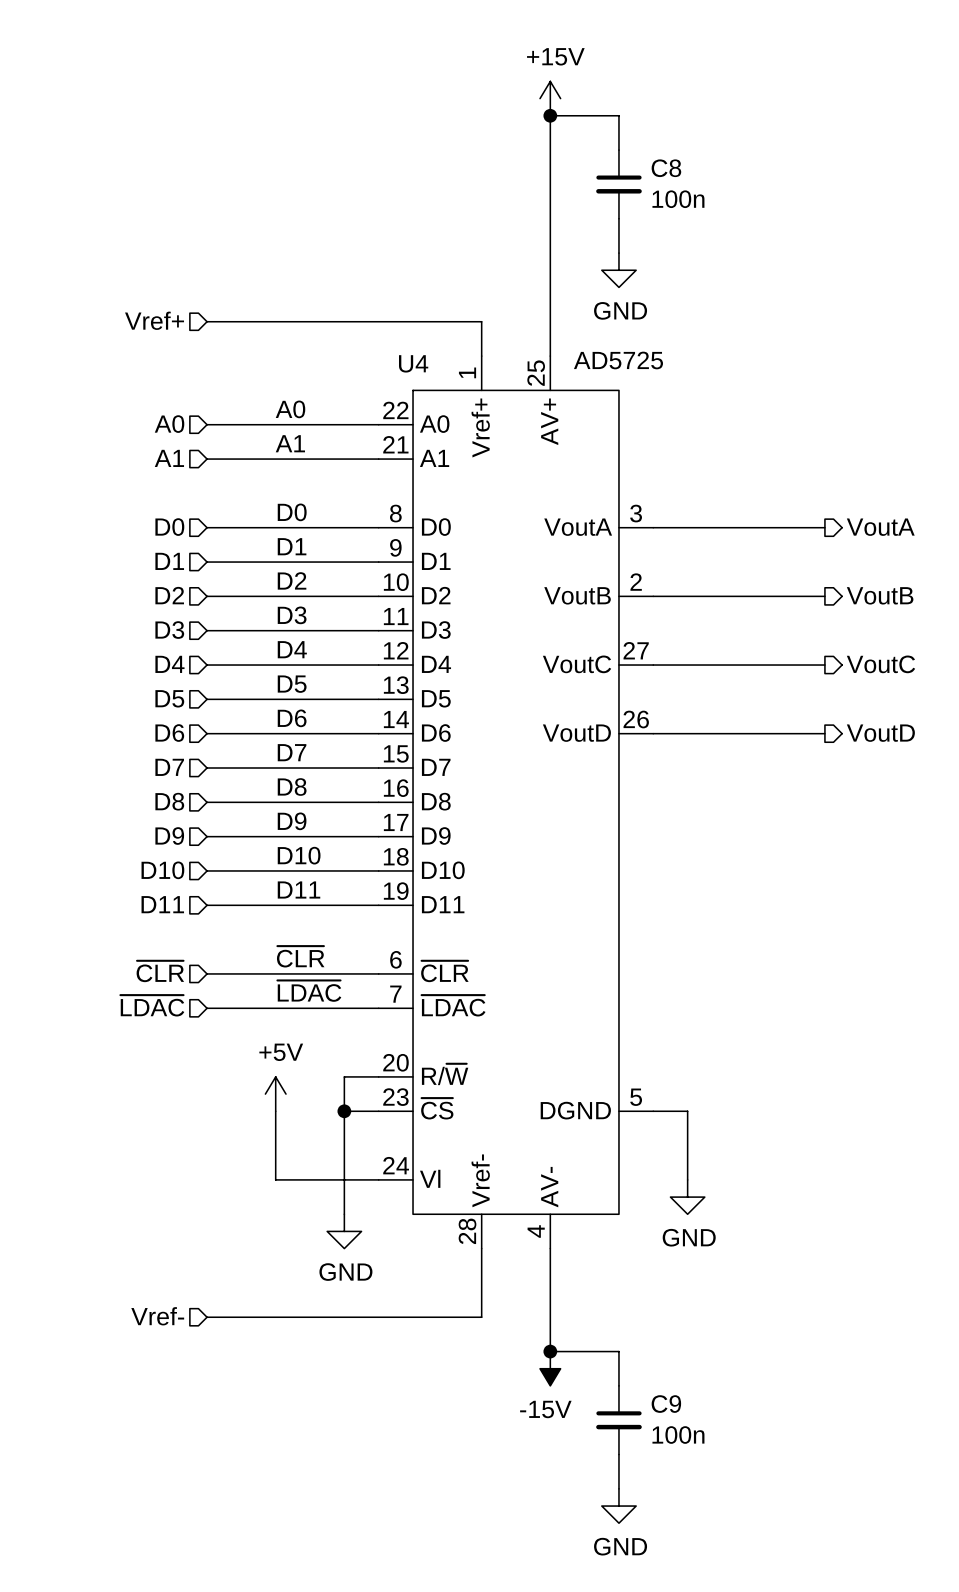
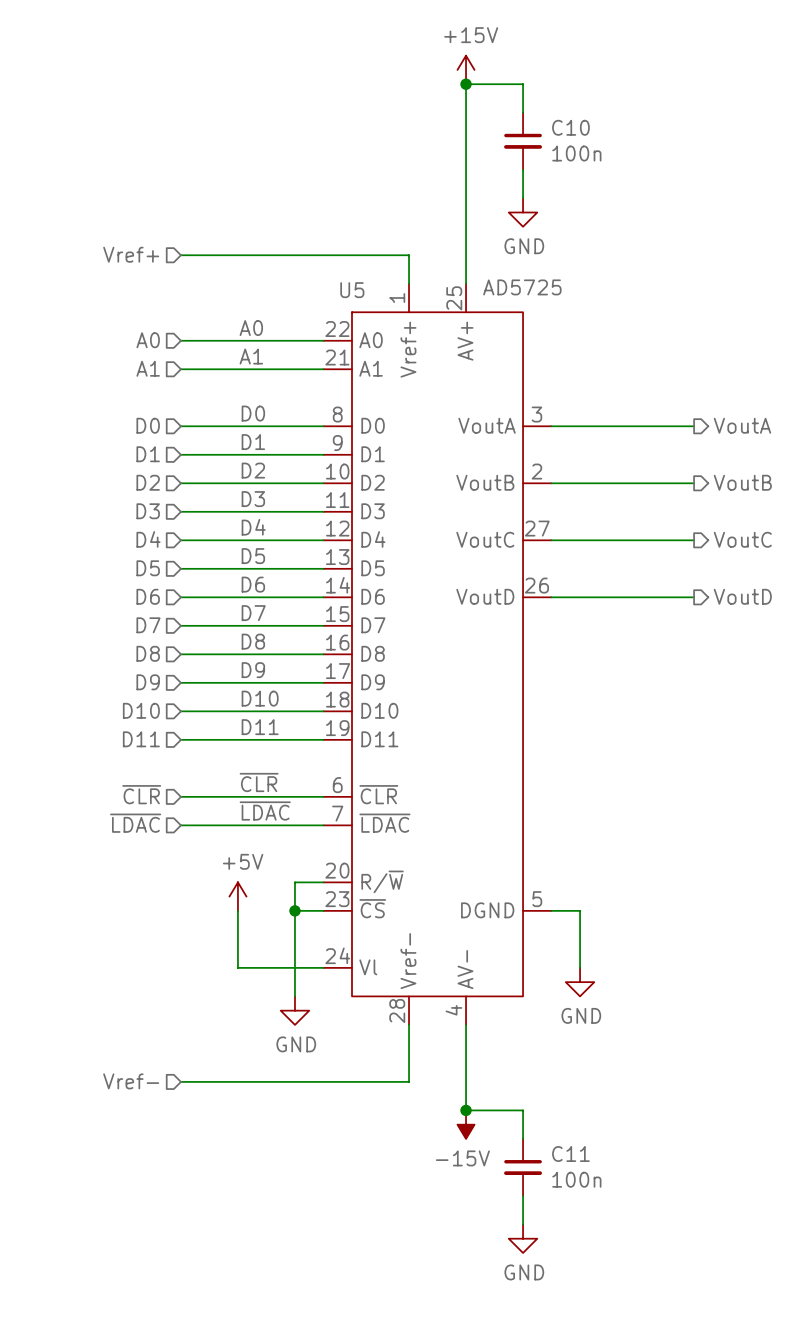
C8 name: C8 (666, 168) -> C10 (570, 127)
U4 name: U4 (413, 363) -> U5 (352, 290)
C9 name: C9 (666, 1404) -> C11 (570, 1154)

